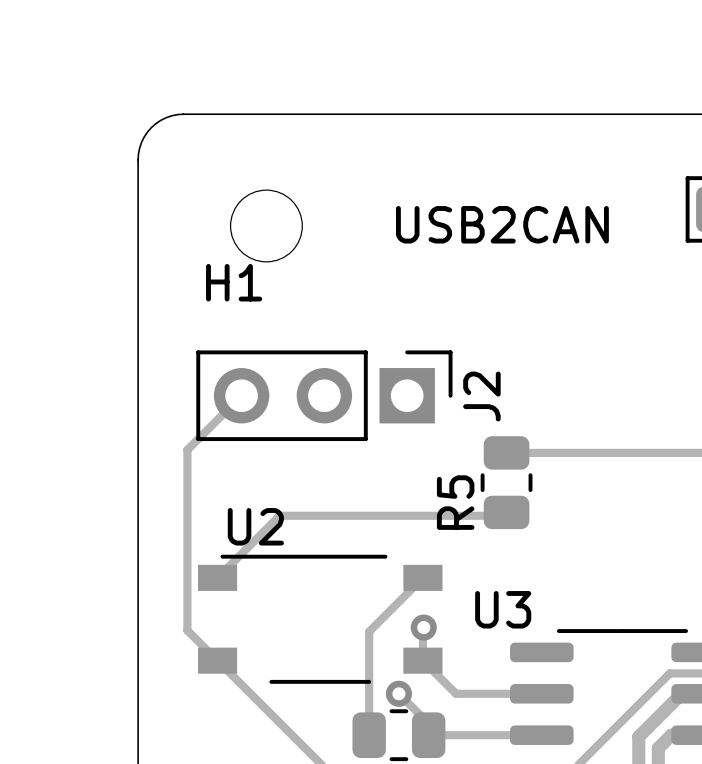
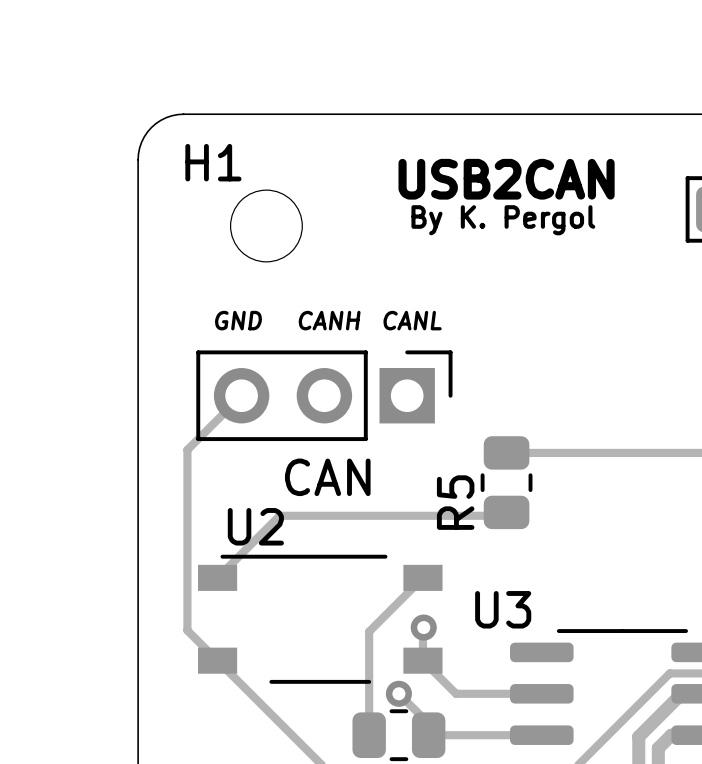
text: none -> By K. Pergol (503, 220)
text position: USB2CAN (502, 224) -> USB2CAN (506, 179)
H1 name position: H1 (234, 282) -> H1 (213, 162)
text: none -> GND (238, 320)
text: none -> CANH (329, 320)
text: none -> CANL (412, 320)
J2 name: J2 (481, 396) -> CAN (327, 477)

